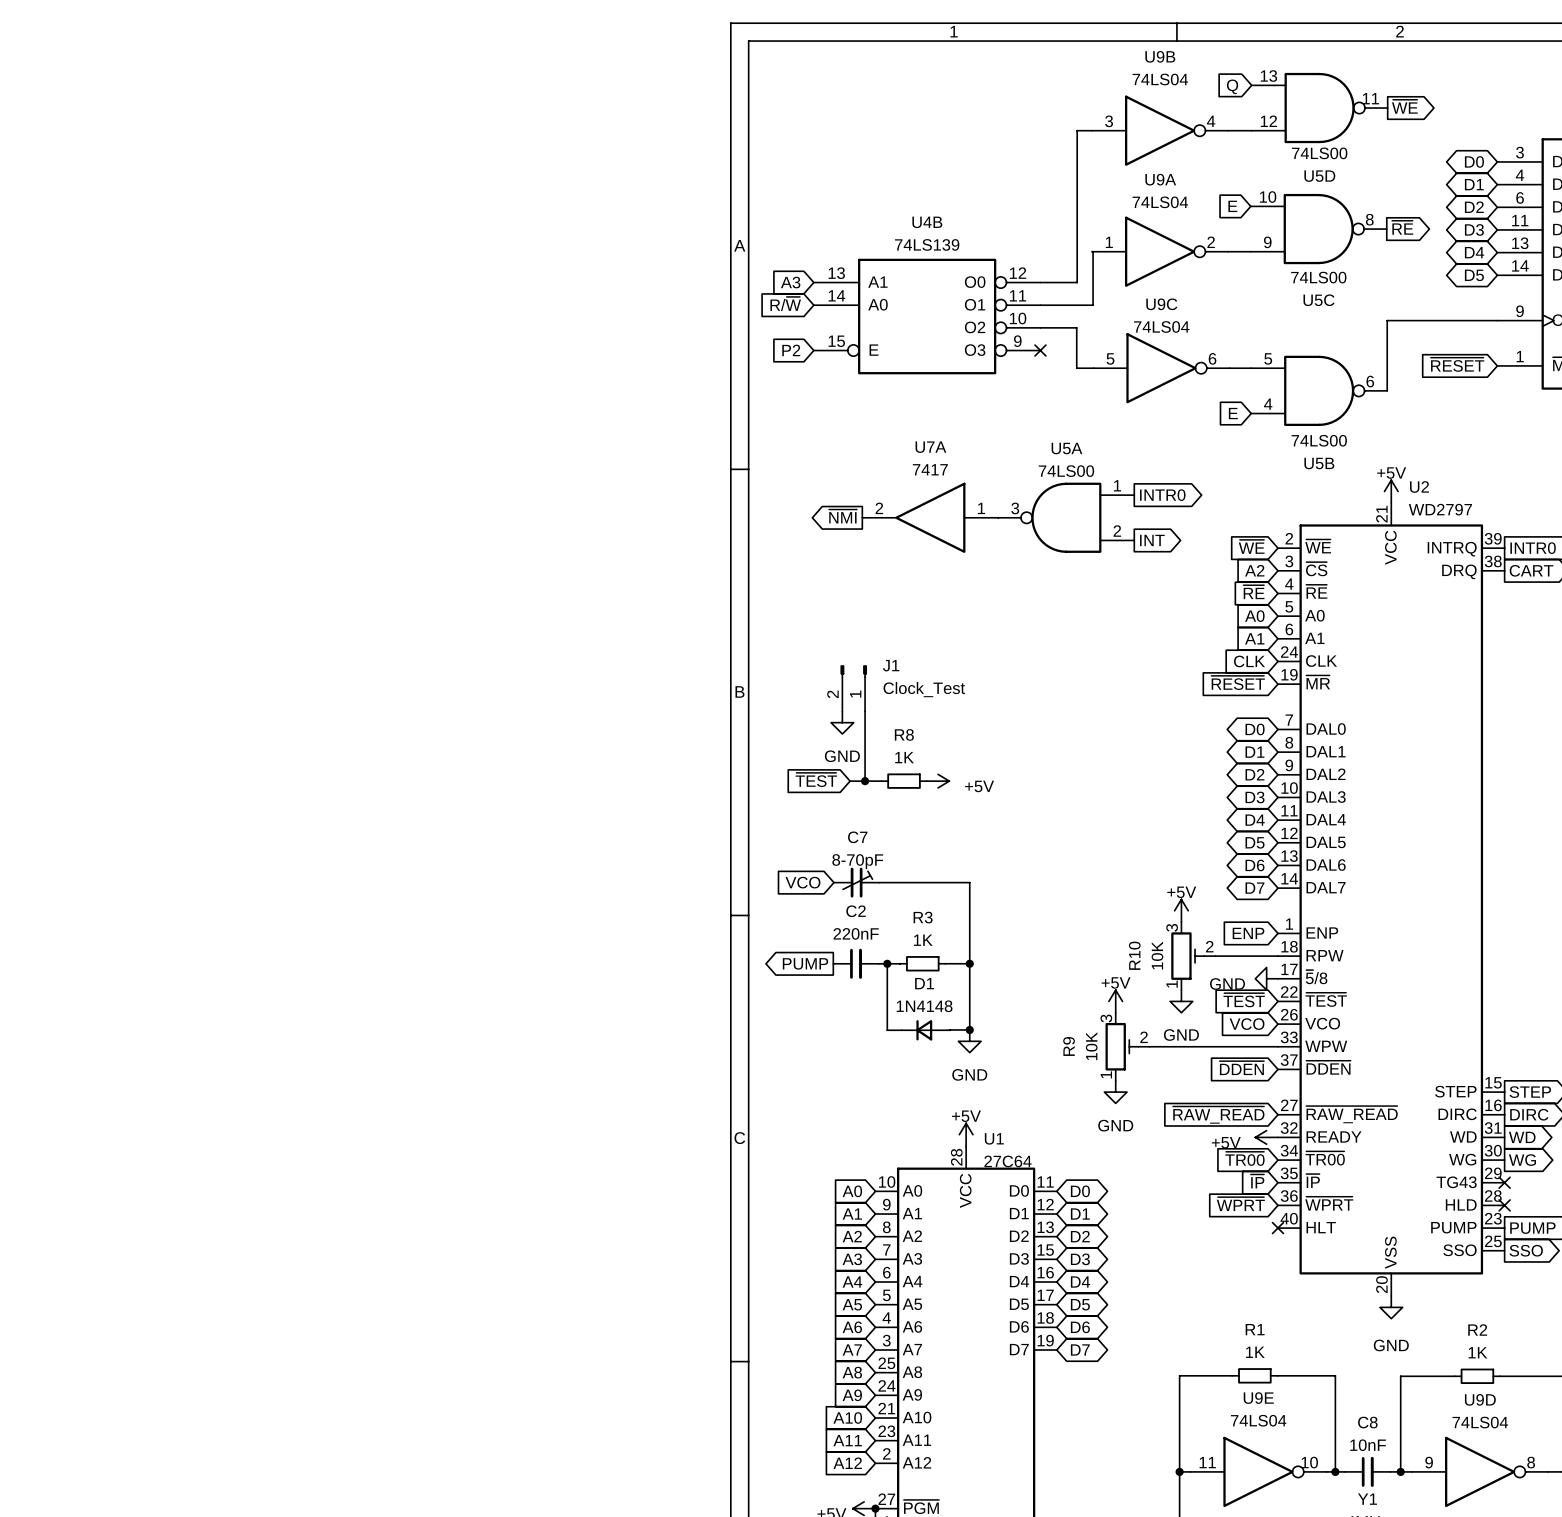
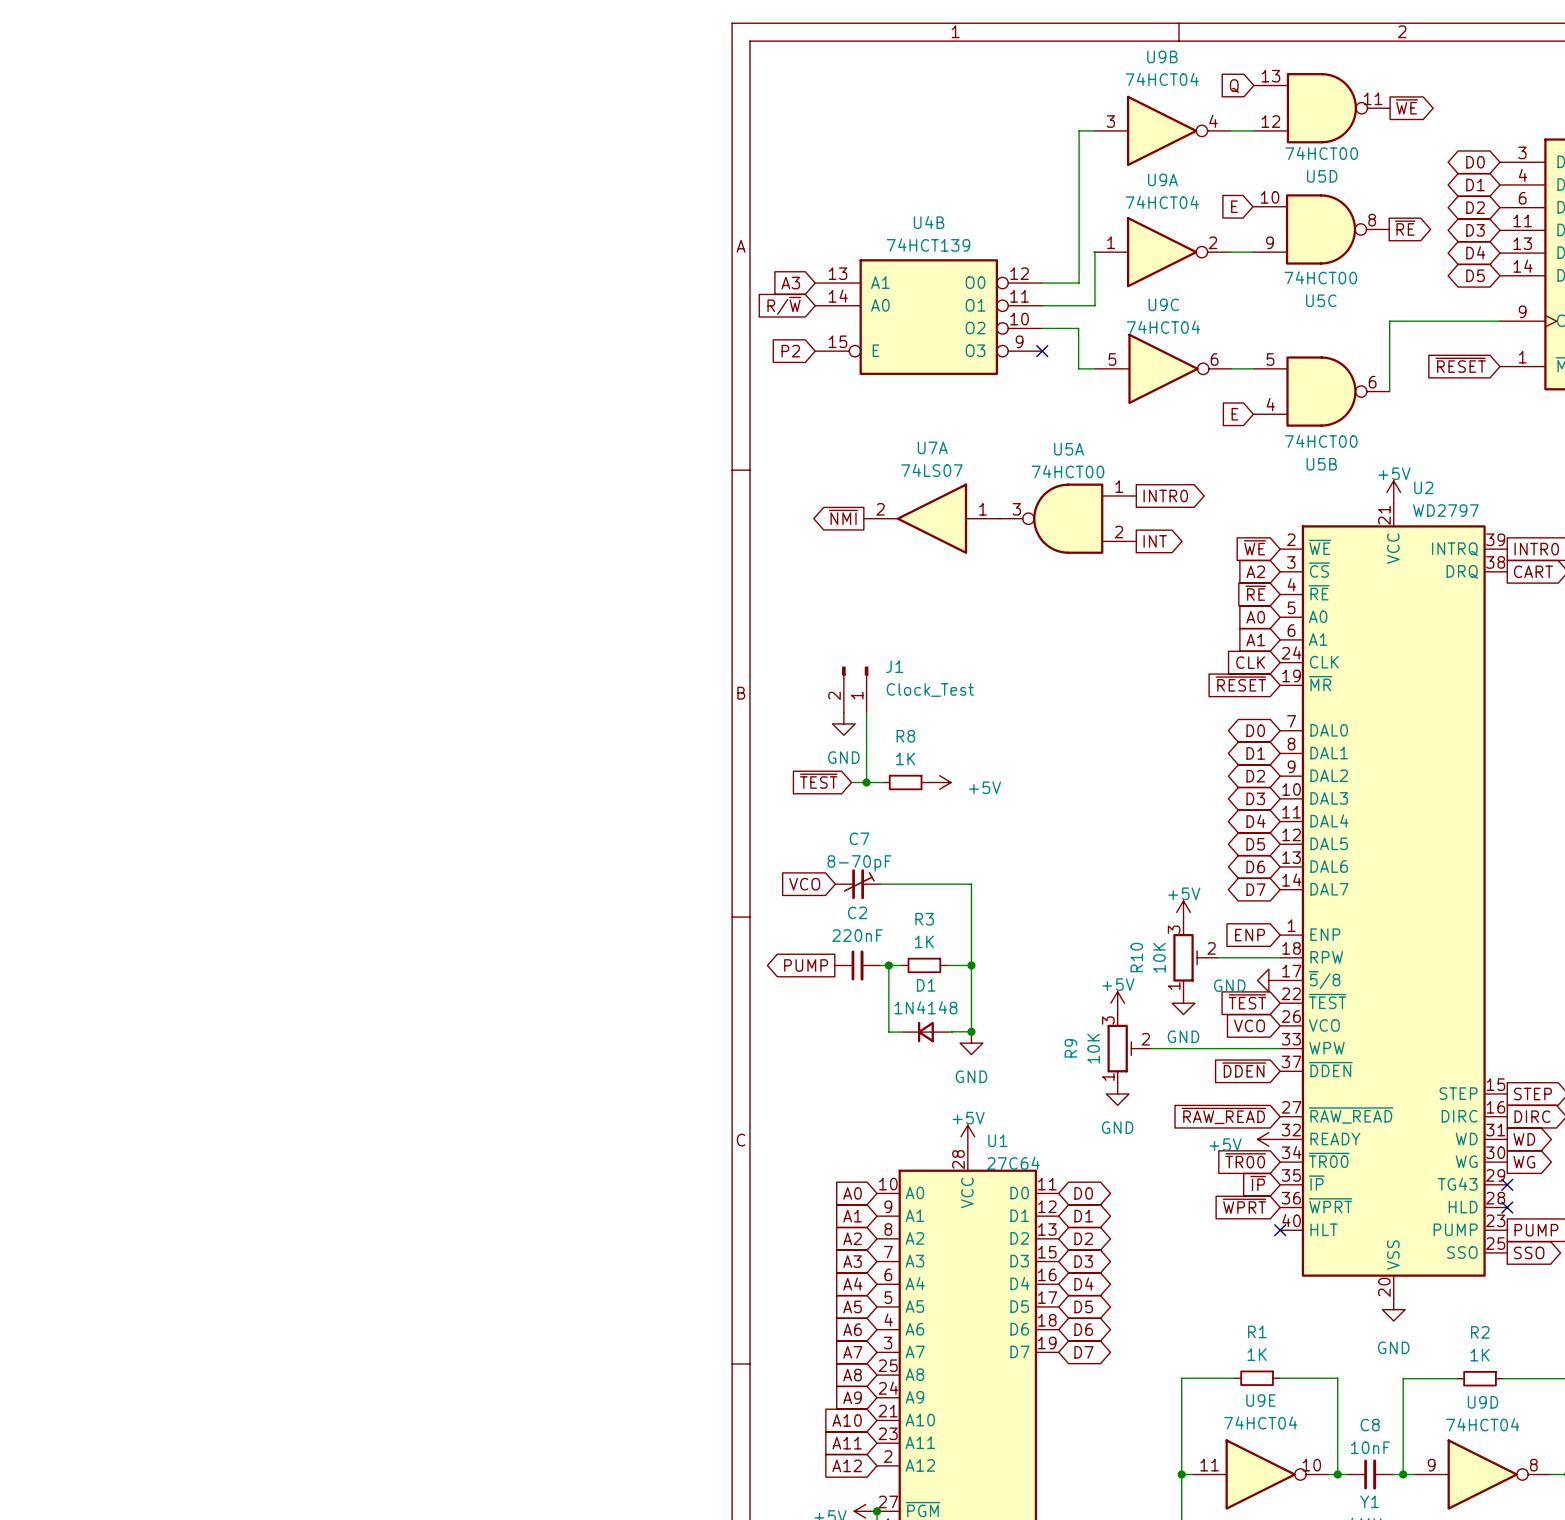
U9B value: 74LS04 (1160, 79) -> 74HCT04 (1162, 79)
U5D value: 74LS00 (1319, 153) -> 74HCT00 (1321, 153)
U9A value: 74LS04 (1160, 202) -> 74HCT04 (1162, 202)
U4B value: 74LS139 (927, 244) -> 74HCT139 (928, 245)
U5C value: 74LS00 (1318, 277) -> 74HCT00 (1320, 277)
U9C value: 74LS04 (1161, 326) -> 74HCT04 (1163, 327)
U5B value: 74LS00 (1319, 440) -> 74HCT00 (1321, 441)
U7A value: 7417 (930, 469) -> 74LS07 (931, 470)
U5A value: 74LS00 (1066, 471) -> 74HCT00 (1067, 471)
U9E value: 74LS04 (1258, 1420) -> 74HCT04 (1260, 1422)
U9D value: 74LS04 (1480, 1422) -> 74HCT04 (1482, 1424)

